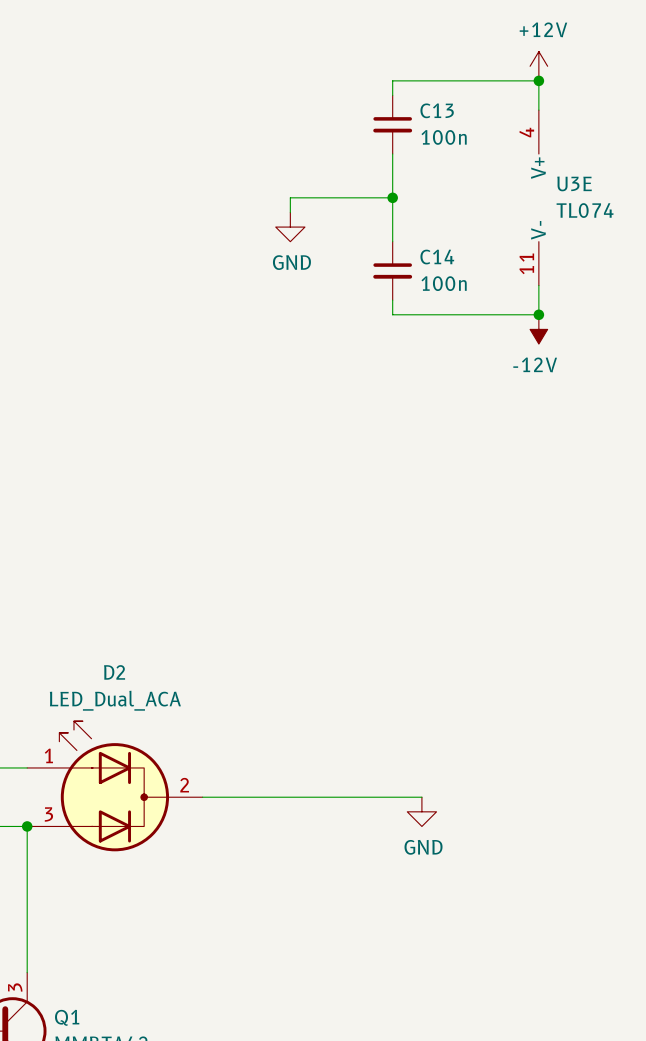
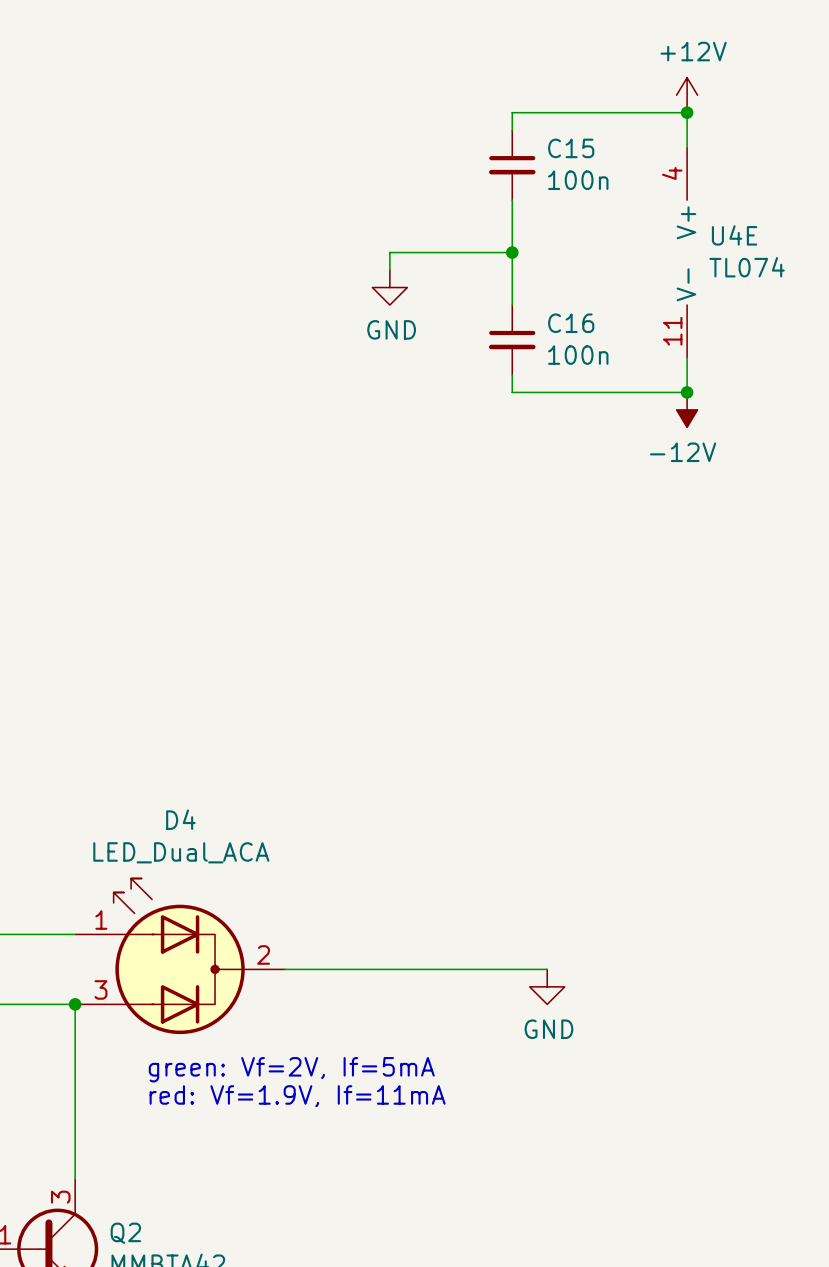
C13 name: C13 (437, 110) -> C15 (571, 148)
U3E name: U3E (574, 183) -> U4E (734, 235)
C14 name: C14 (437, 257) -> C16 (571, 323)
D2 name: D2 (114, 672) -> D4 (180, 819)
text: none -> green: Vf=2V, If=5mA (291, 1069)
text: none -> red: Vf=1.9V, If=11mA (297, 1096)
Q1 name: Q1 (67, 1017) -> Q2 (125, 1233)

